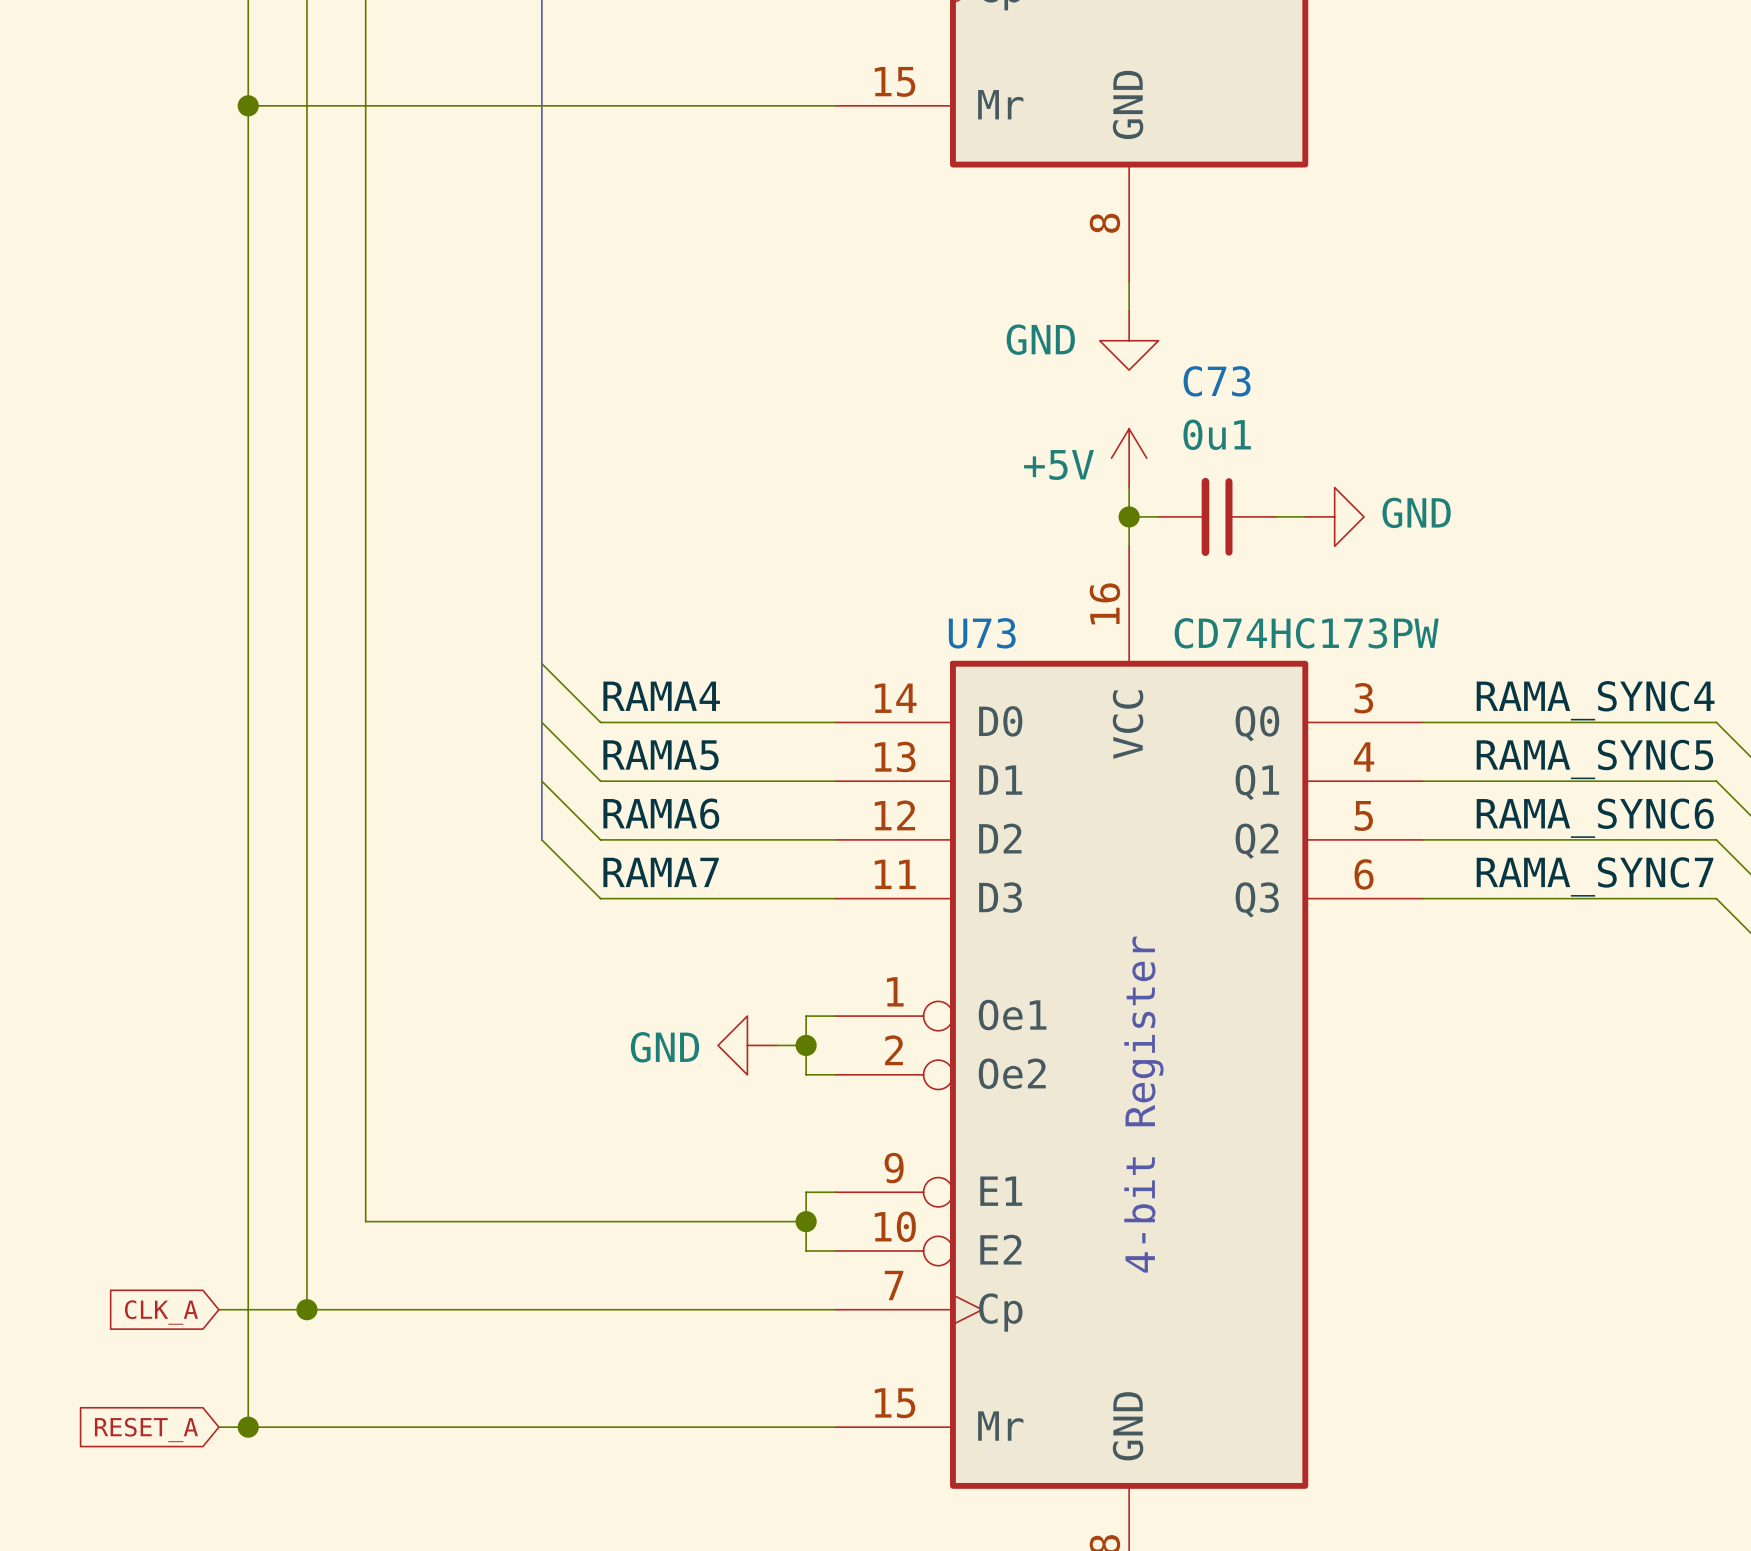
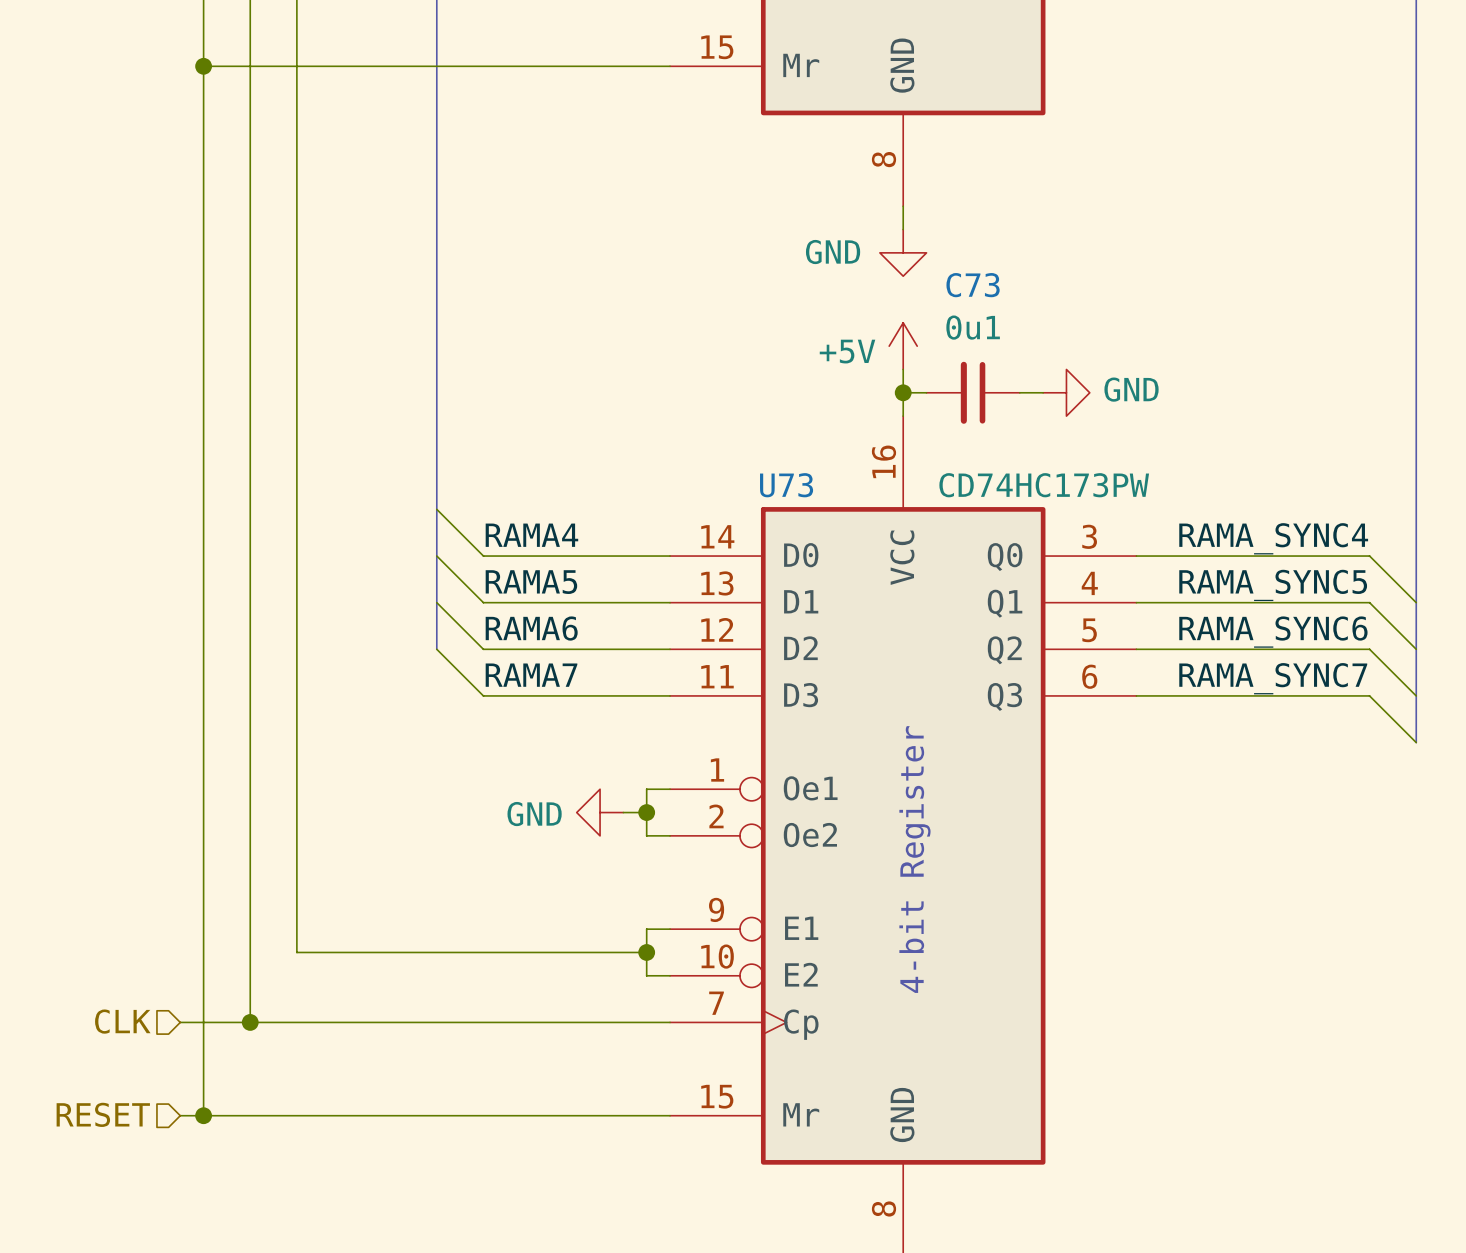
hierarchical label: none -> CLK (122, 1021)
global label: CLK_A (161, 1312) -> none
hierarchical label: none -> RESET (103, 1114)
global label: RESET_A (146, 1429) -> none

